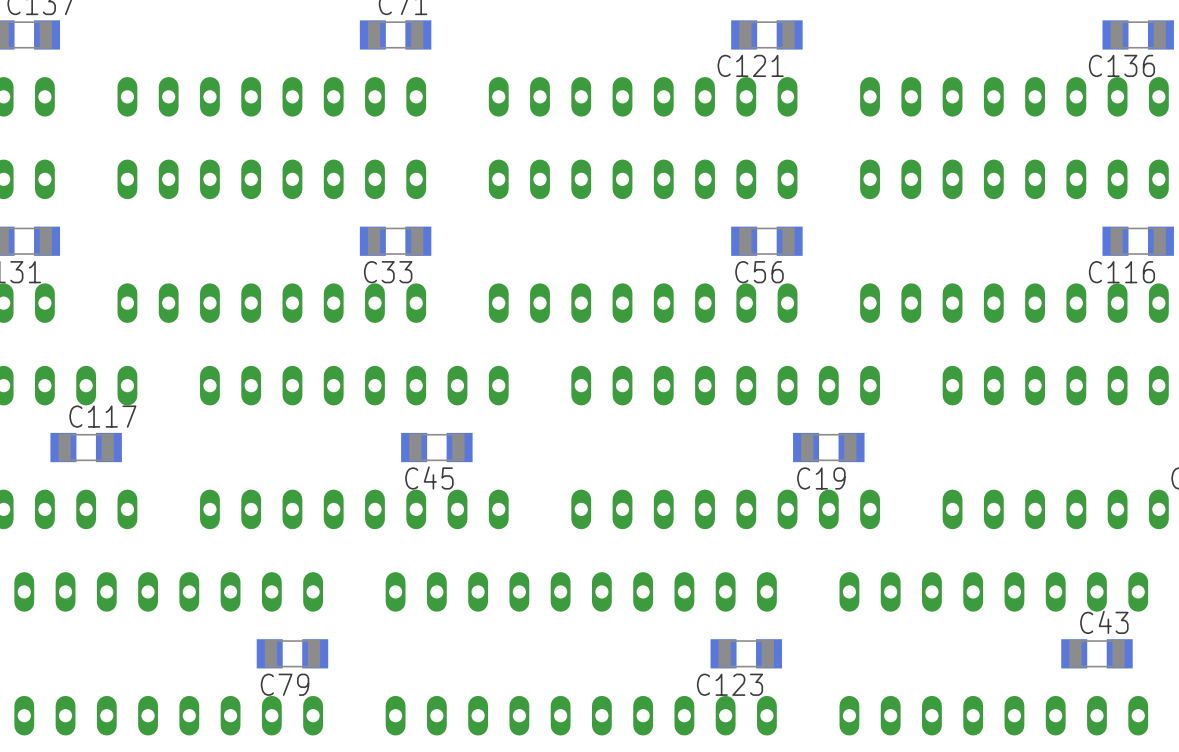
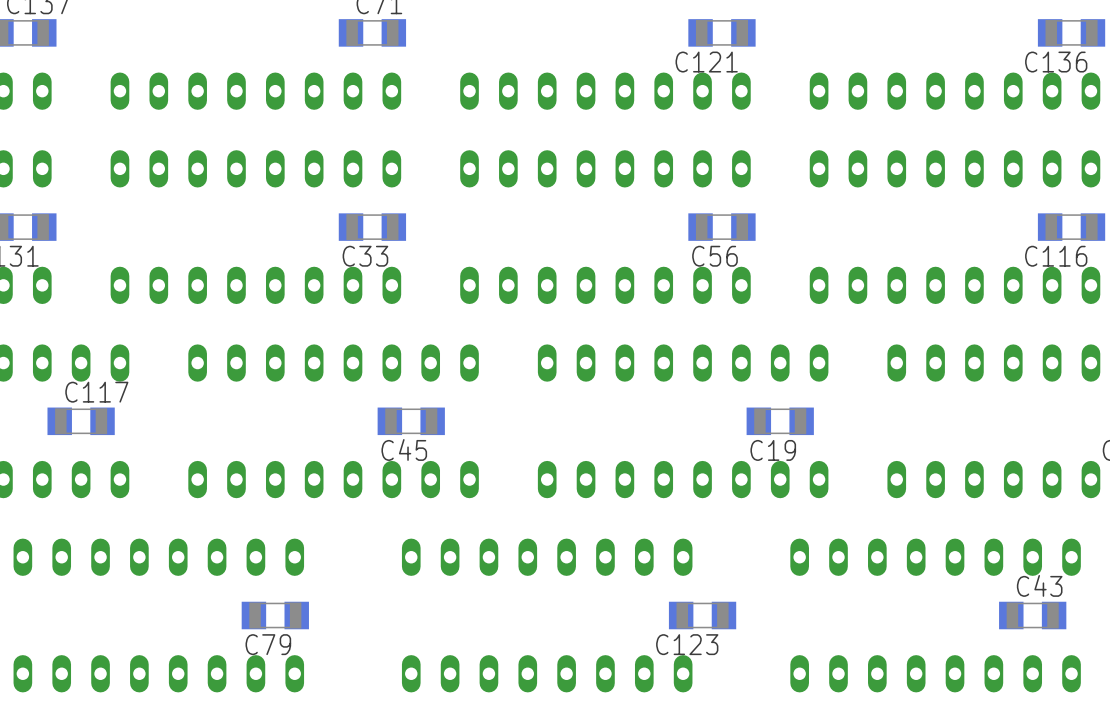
part footprint: [385, 572, 777, 736] -> [401, 538, 693, 693]

